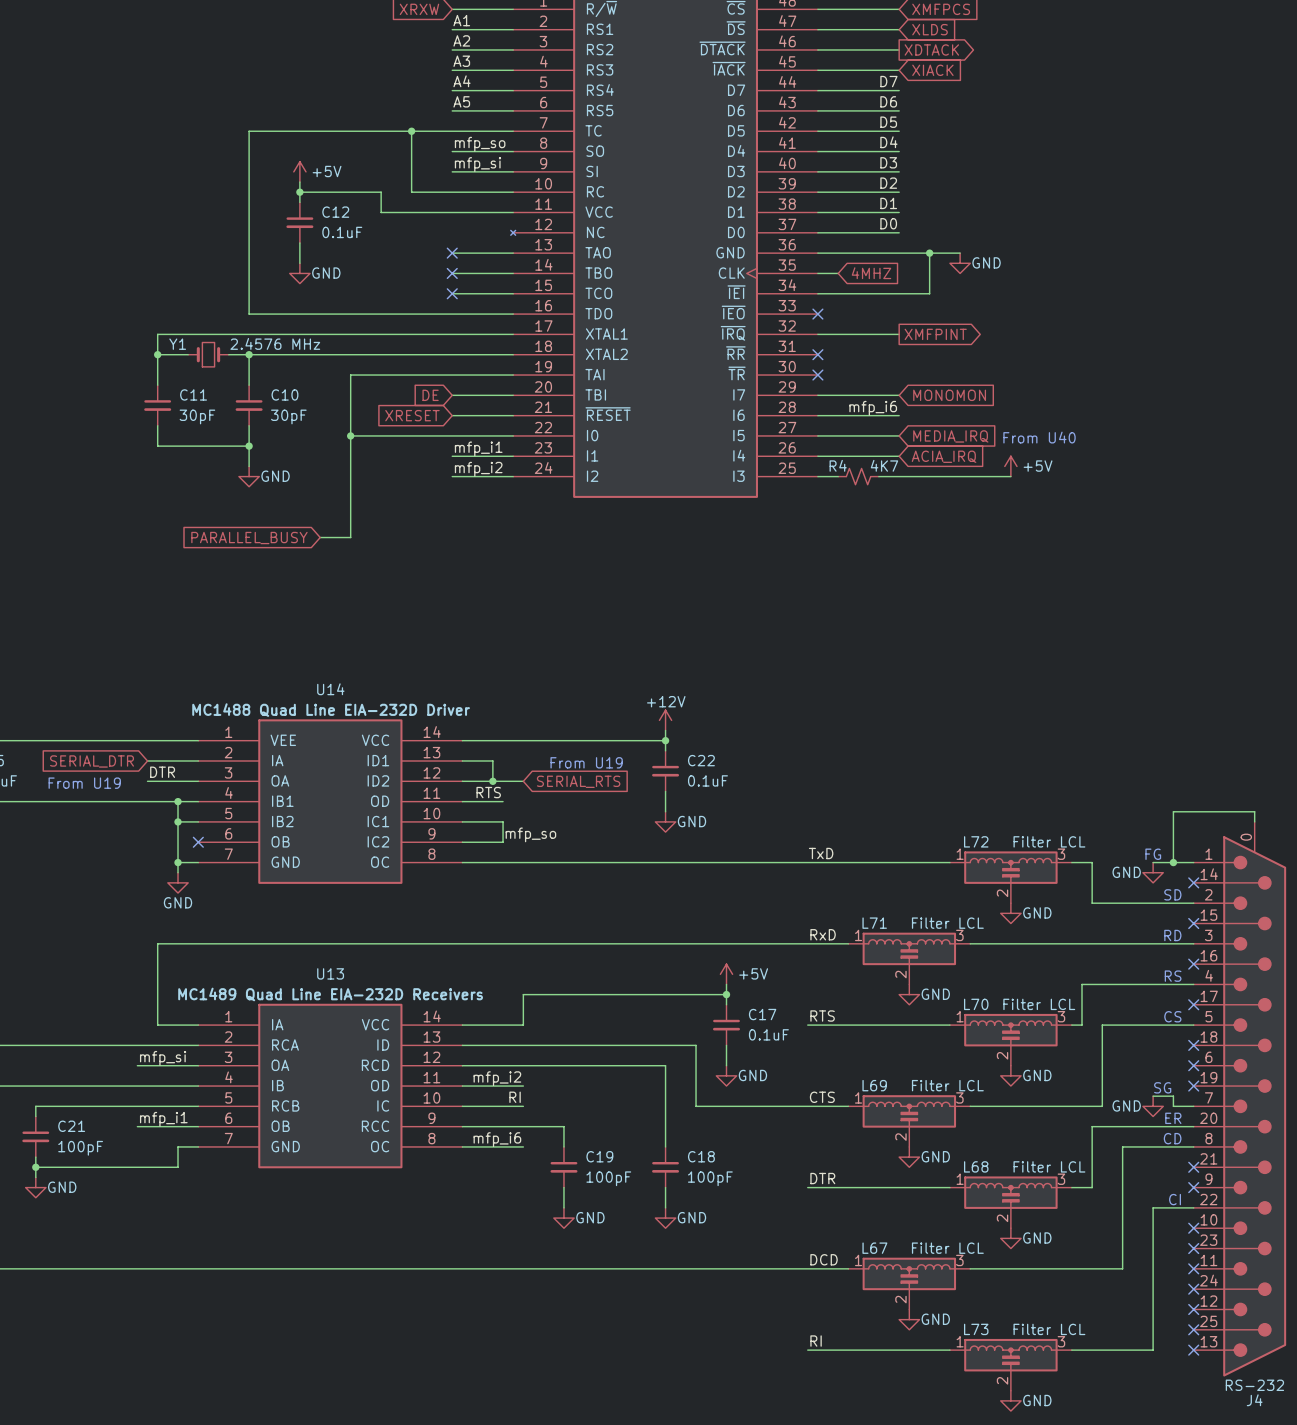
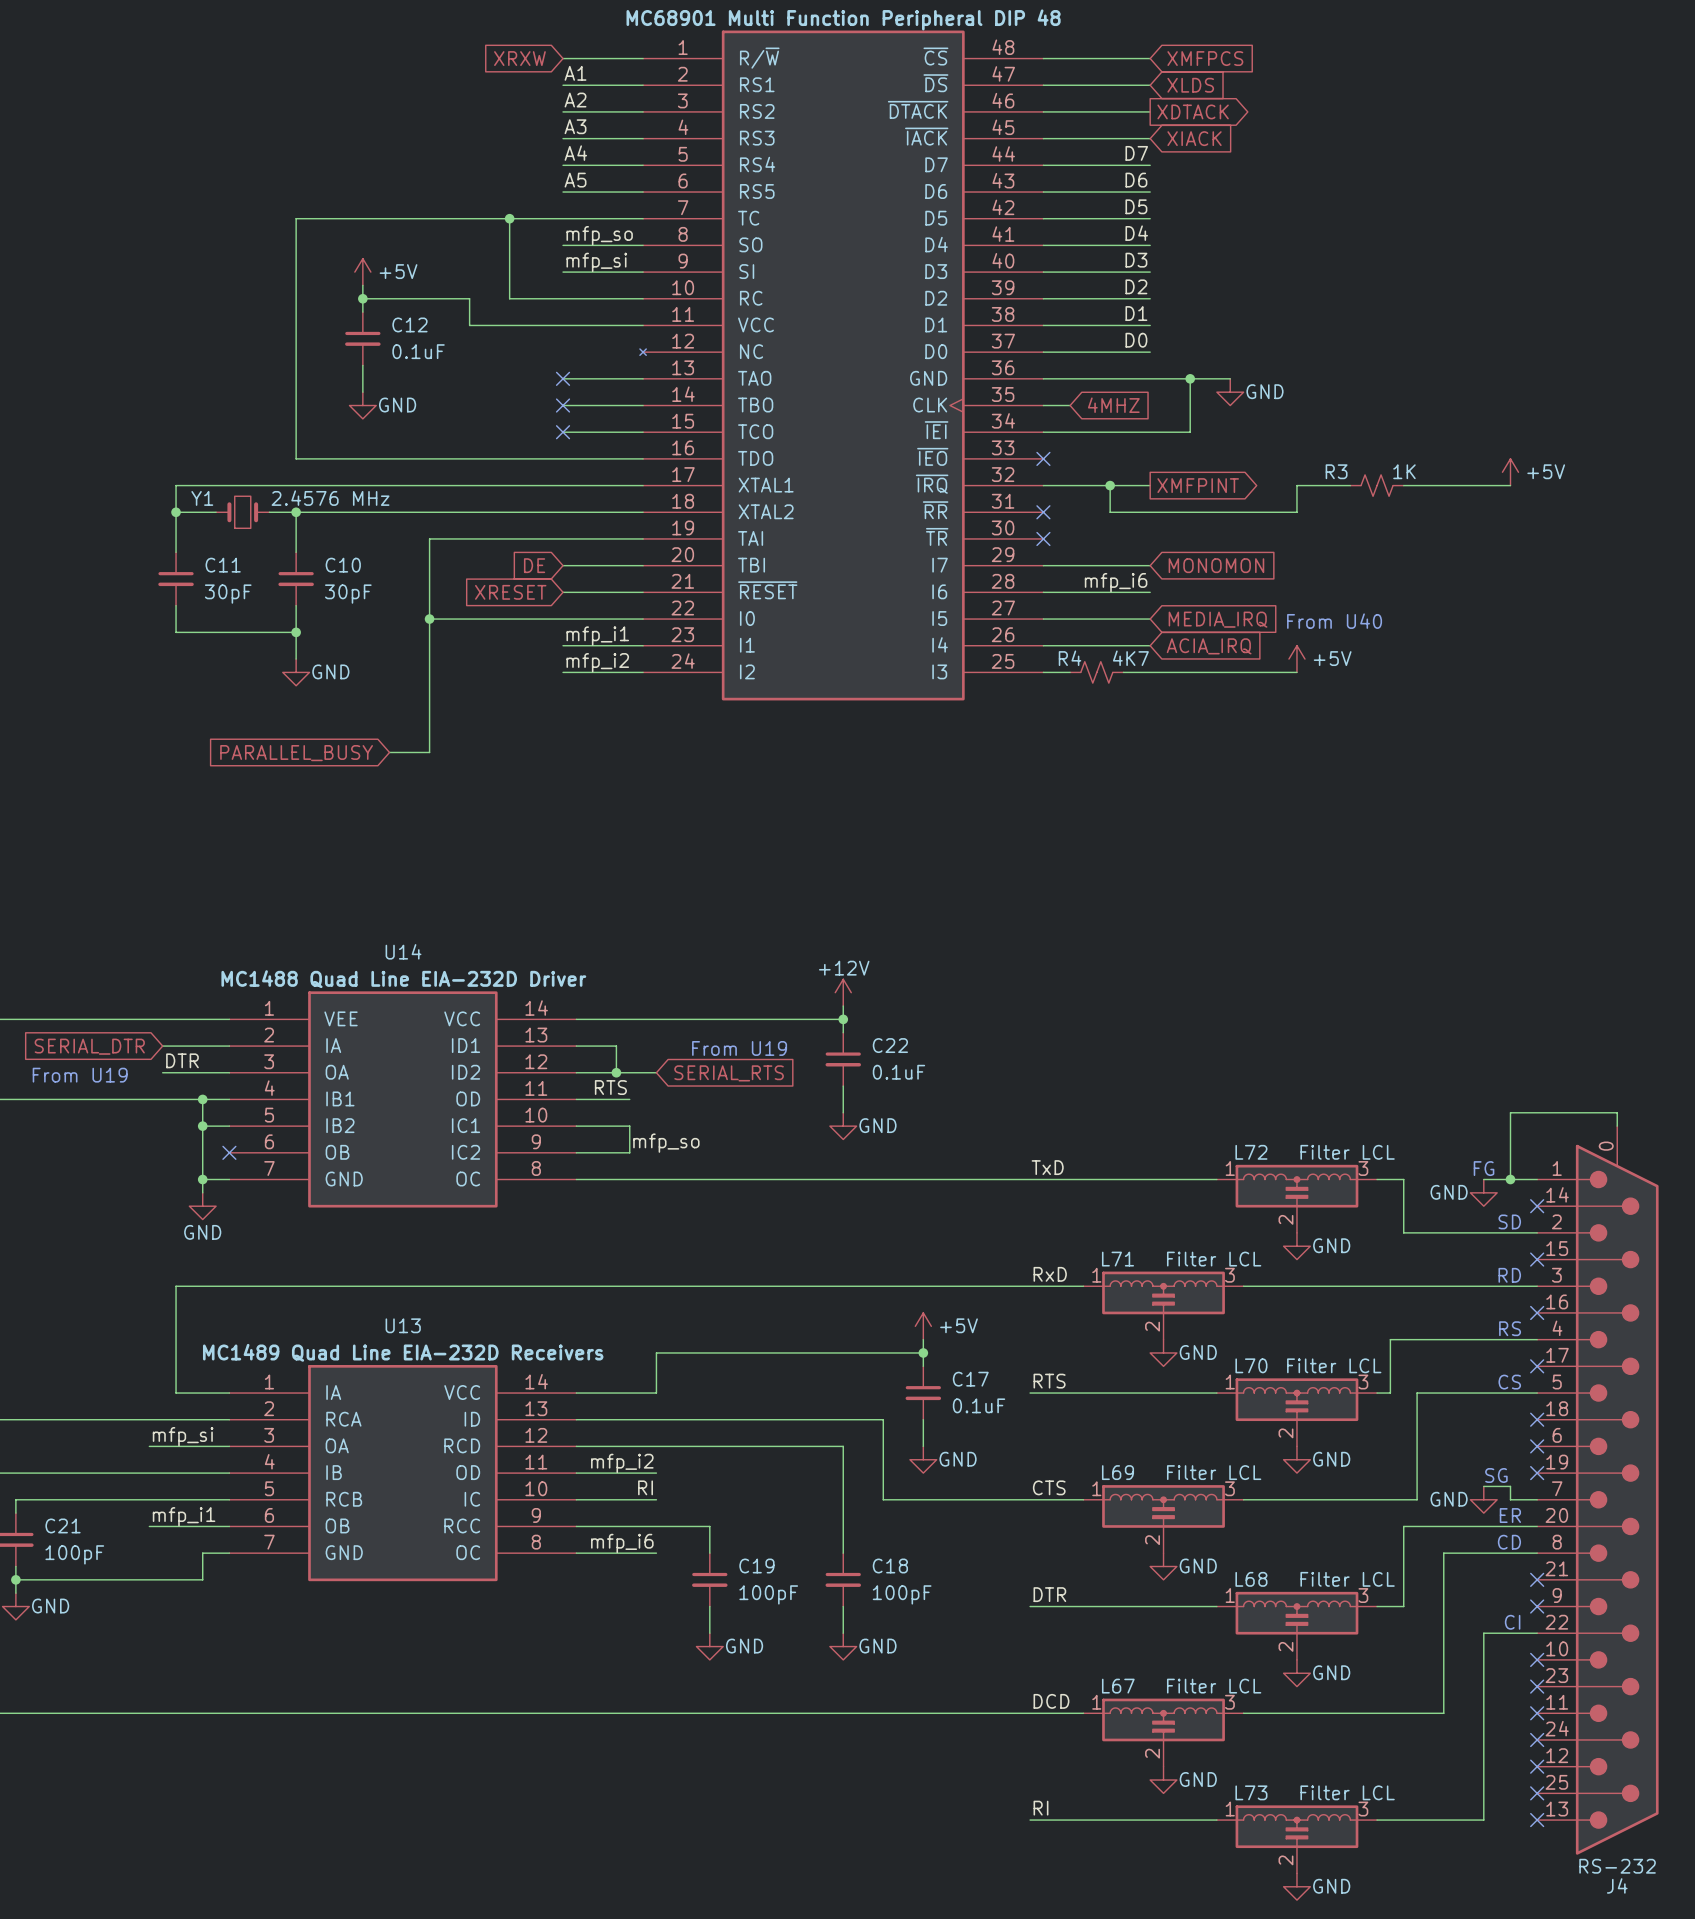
power symbol: none -> +5V (1510, 472)
wire: none -> (1110, 485) (1110, 512) (1296, 512) (1296, 485) (1350, 485)
junction: none -> (1110, 485)
R3: none -> 1K (1377, 485)
wire: none -> (1403, 485) (1510, 485)

